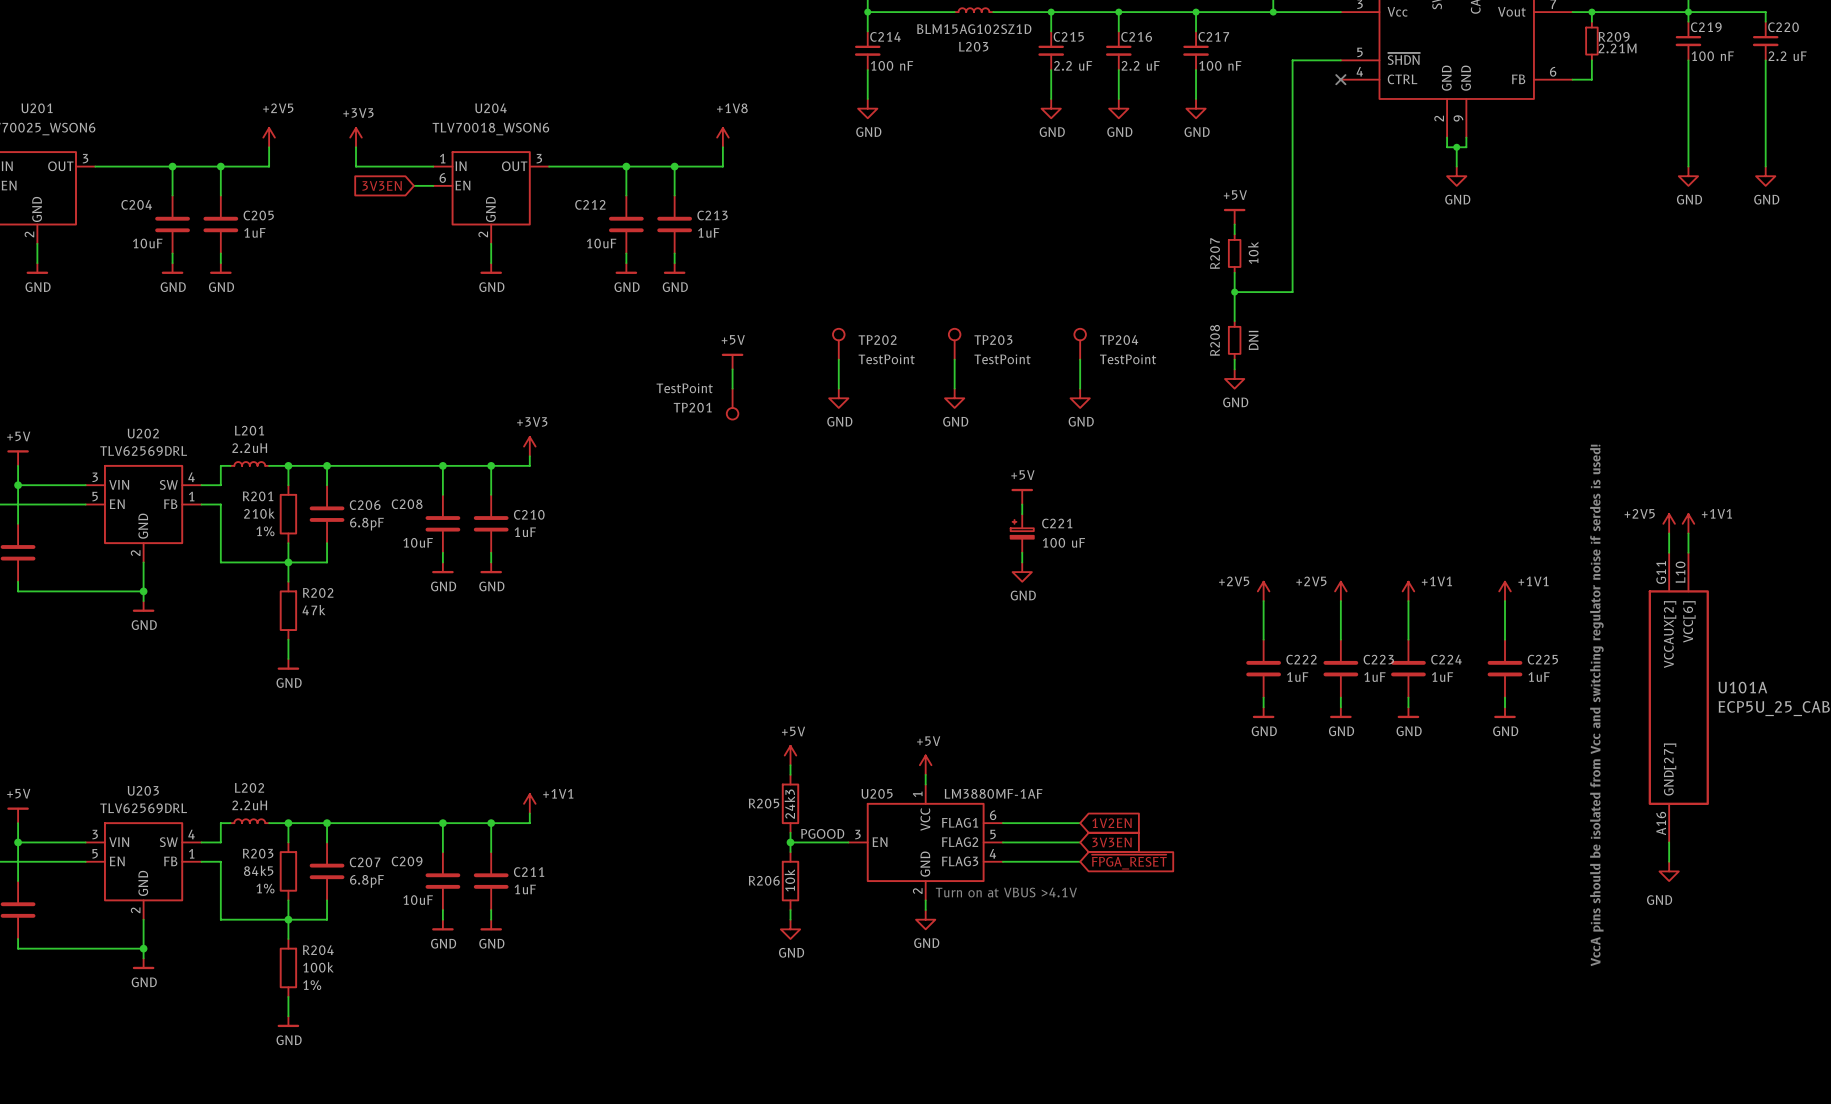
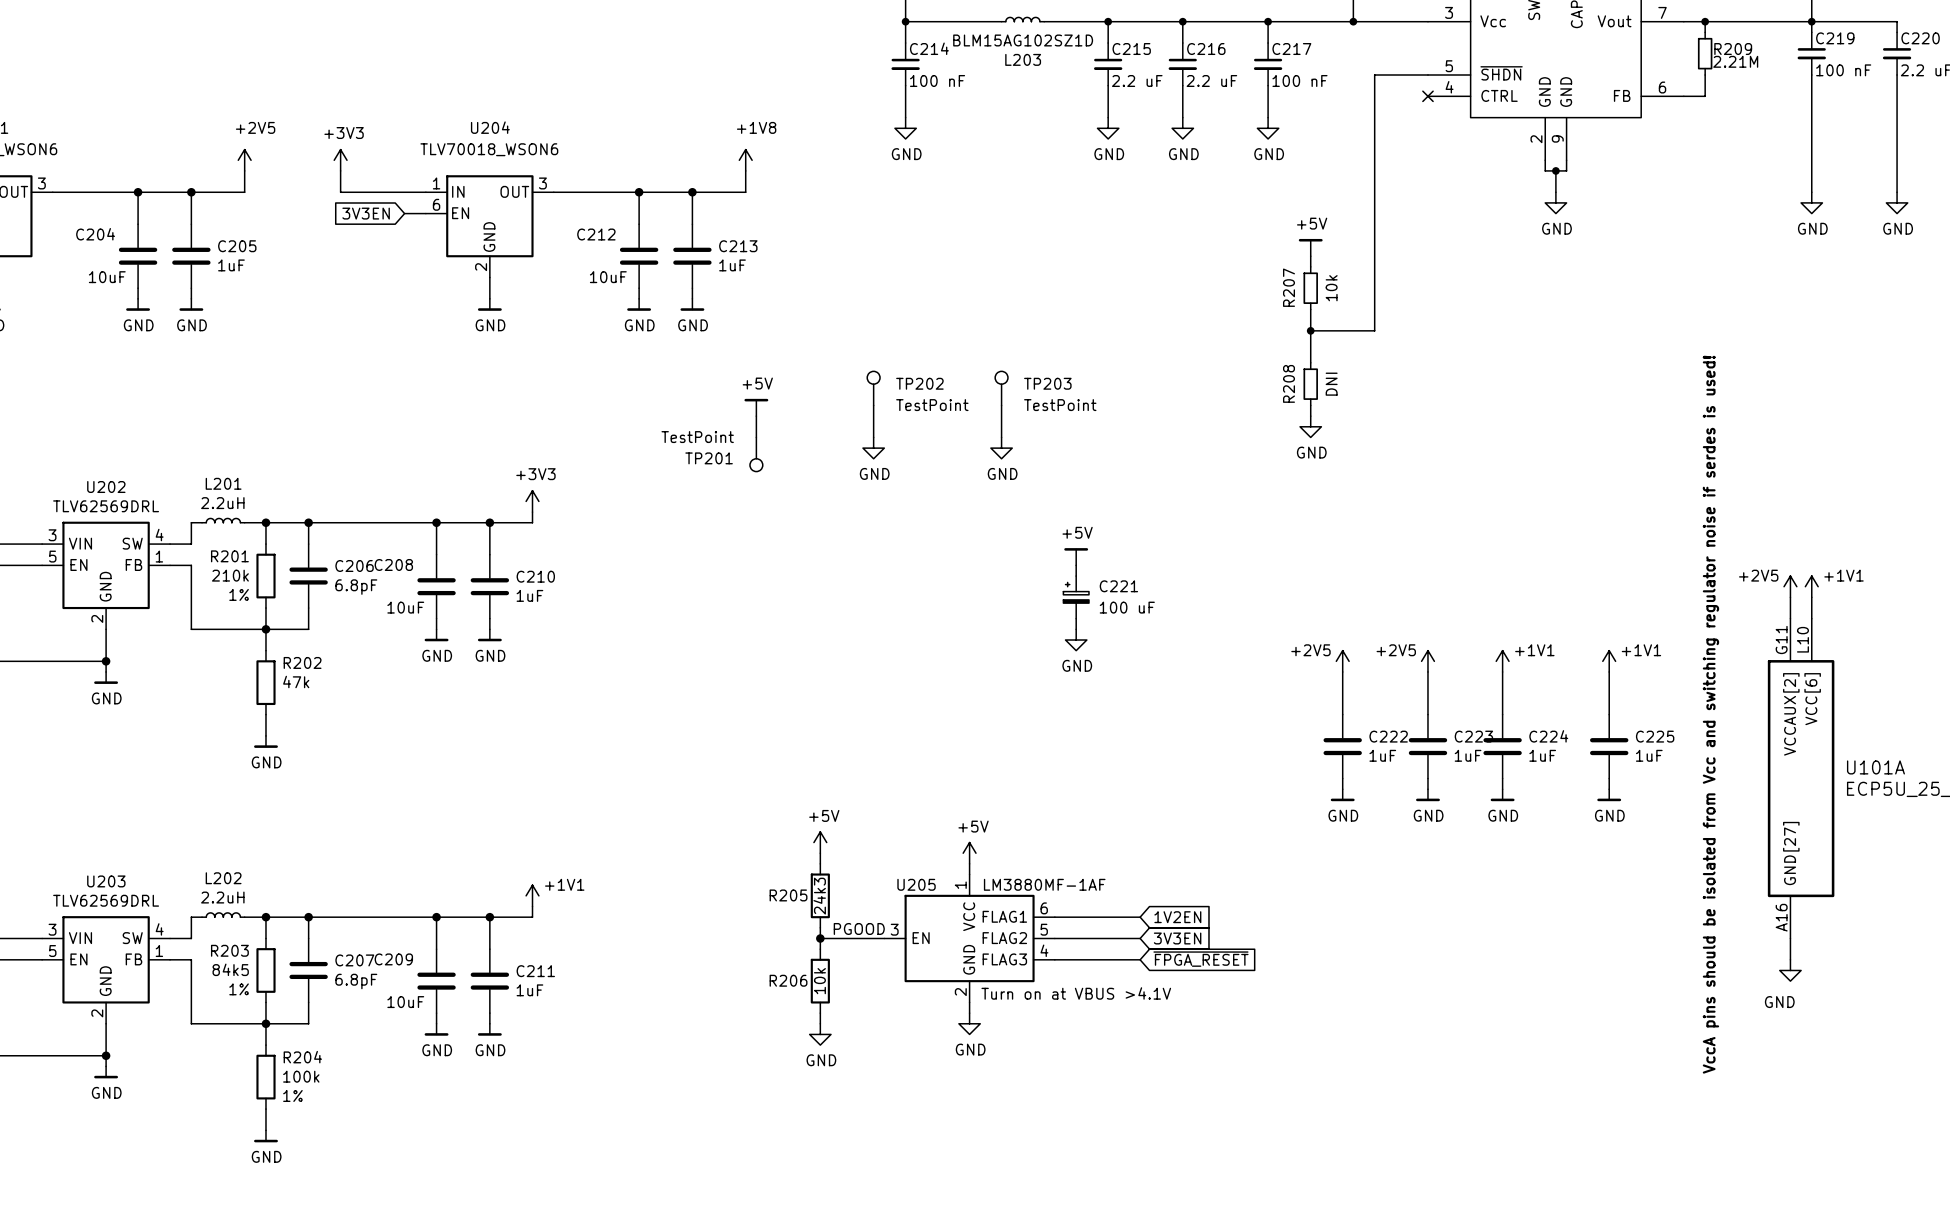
TP204: TestPoint (1080, 344) -> none
wire: (1080, 359) (1080, 388) -> none
power symbol: GND (1080, 398) -> none

